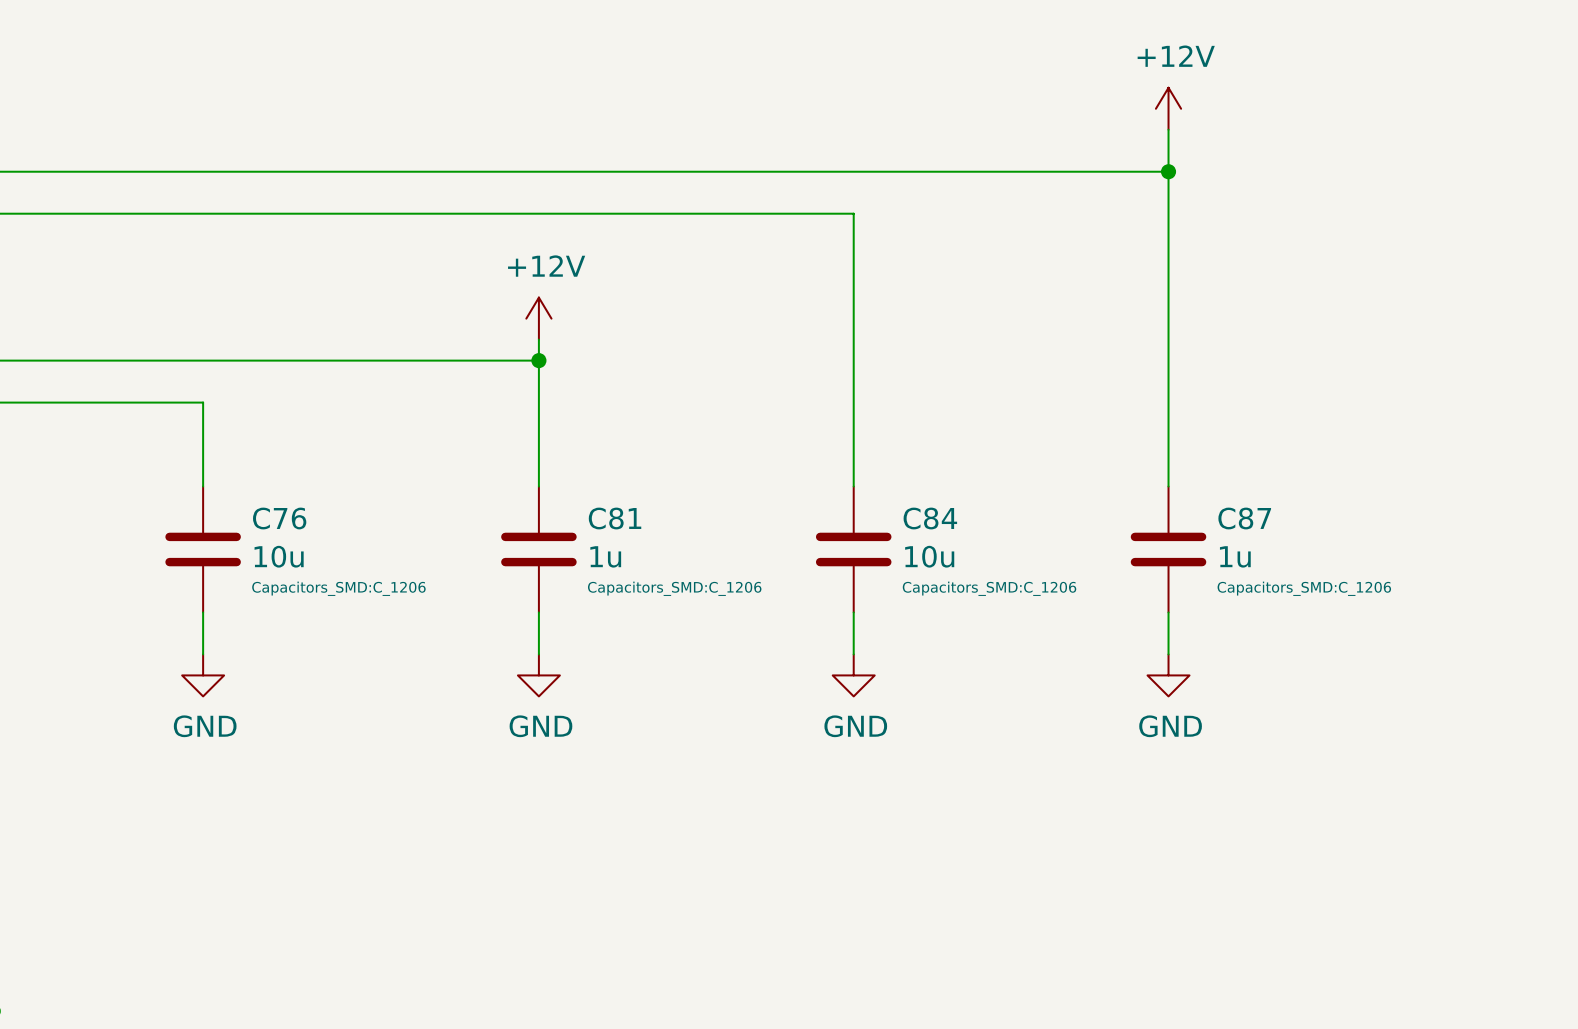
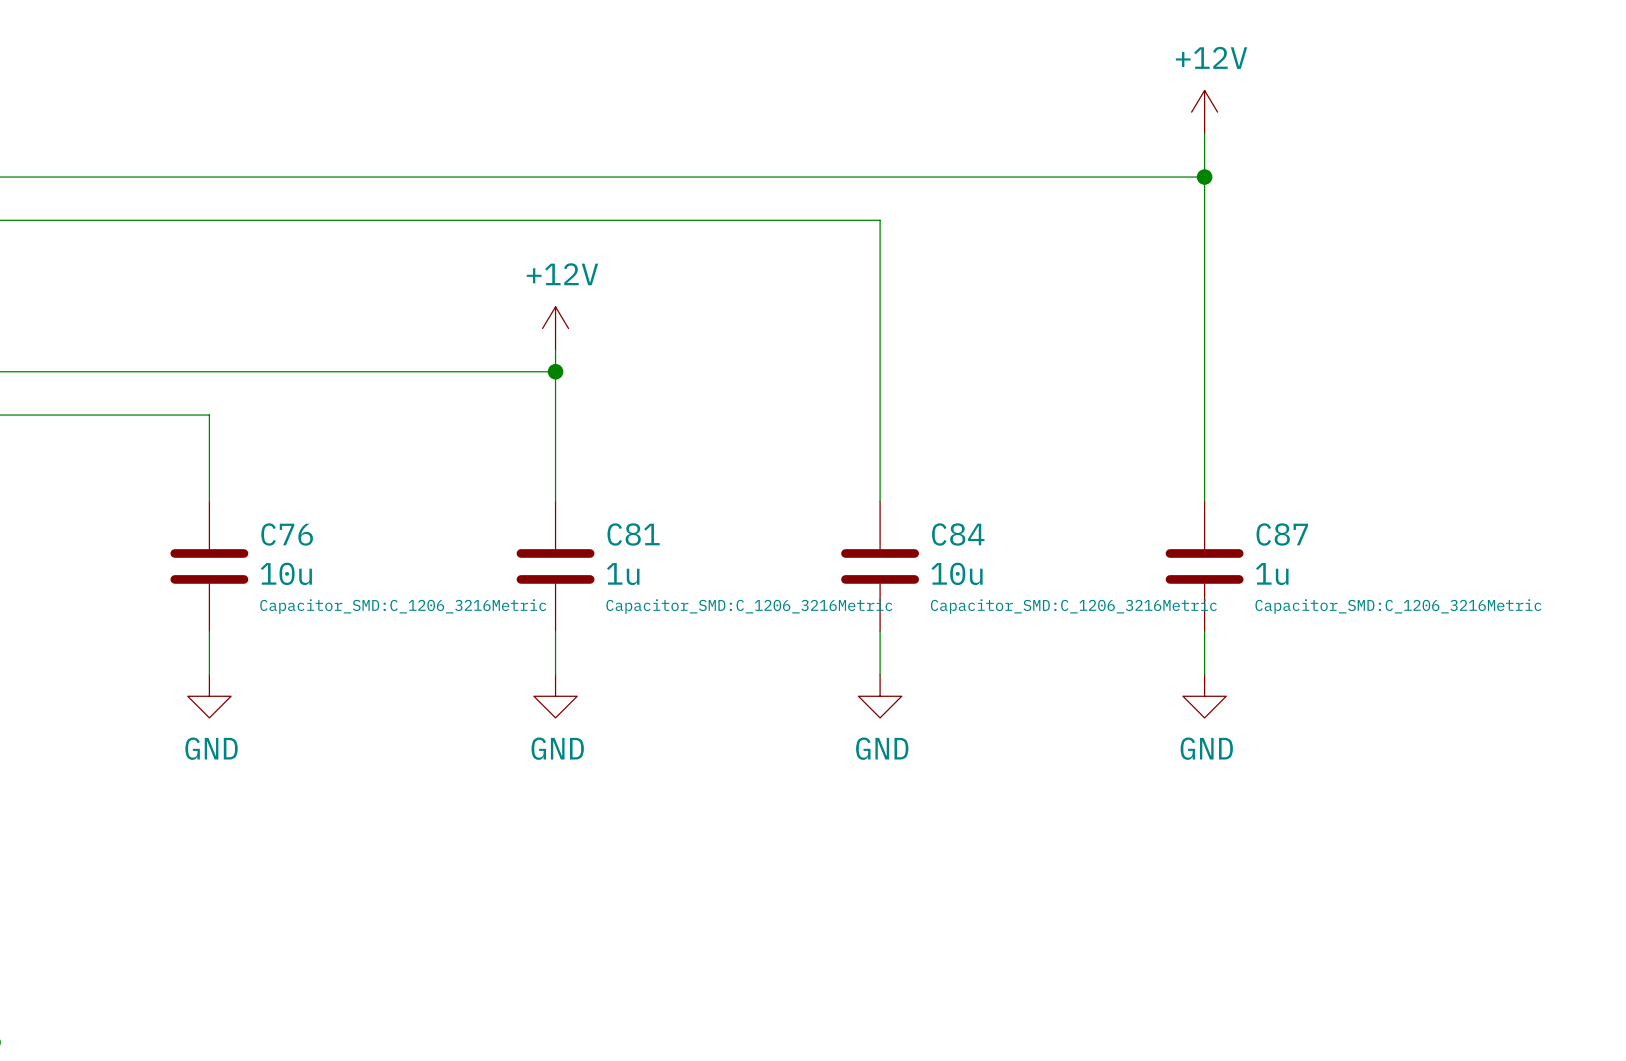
C76 text: Capacitors_SMD:C_1206 (338, 588) -> Capacitor_SMD:C_1206_3216Metric (403, 606)
C81 text: Capacitors_SMD:C_1206 (674, 588) -> Capacitor_SMD:C_1206_3216Metric (749, 606)
C84 text: Capacitors_SMD:C_1206 (989, 588) -> Capacitor_SMD:C_1206_3216Metric (1073, 606)
C87 text: Capacitors_SMD:C_1206 (1304, 588) -> Capacitor_SMD:C_1206_3216Metric (1398, 606)

